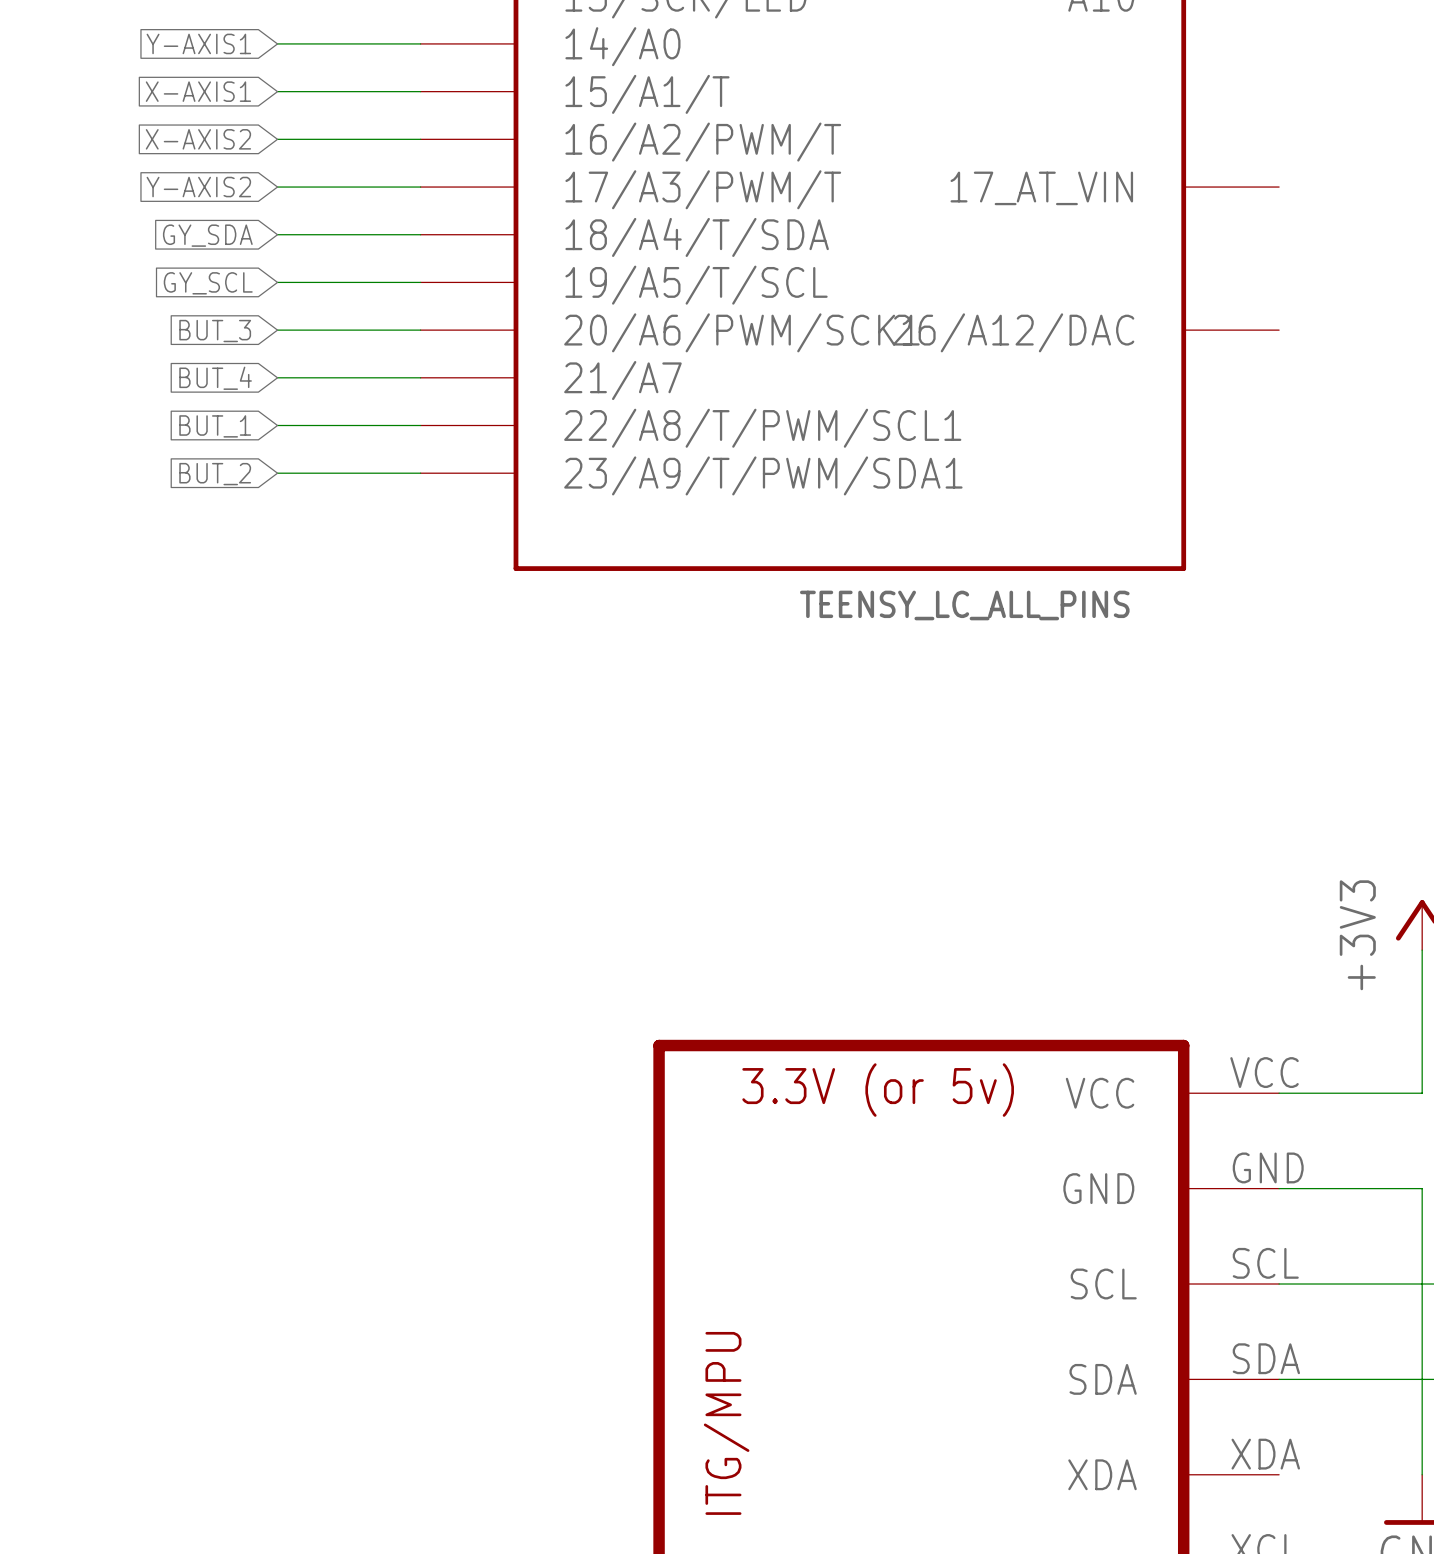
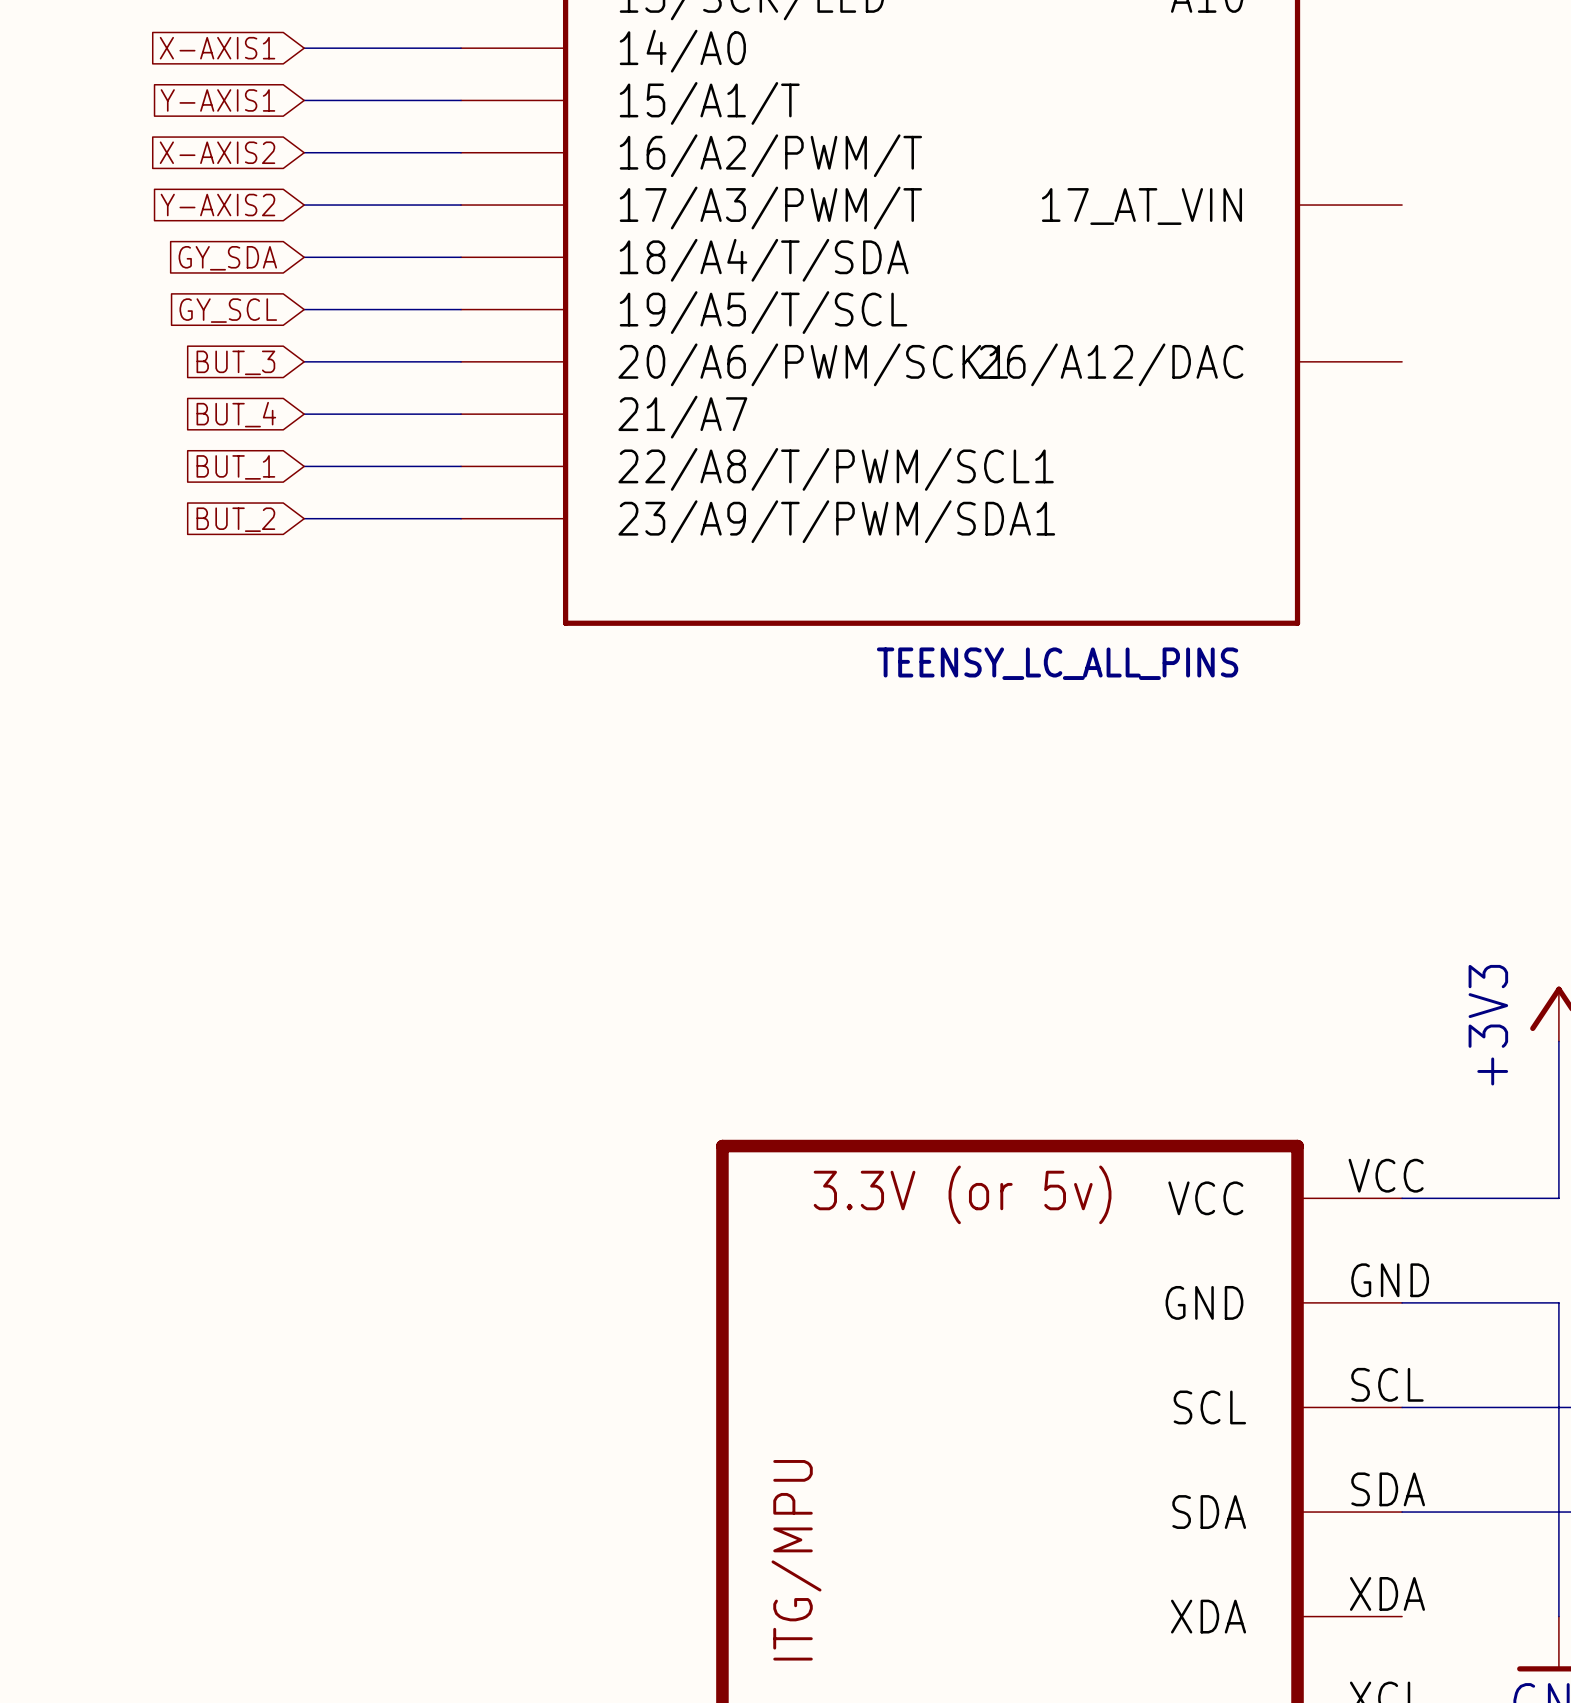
global label: Y-AXIS1 (198, 43) -> X-AXIS1 (217, 48)
global label: X-AXIS1 (198, 91) -> Y-AXIS1 (217, 100)

